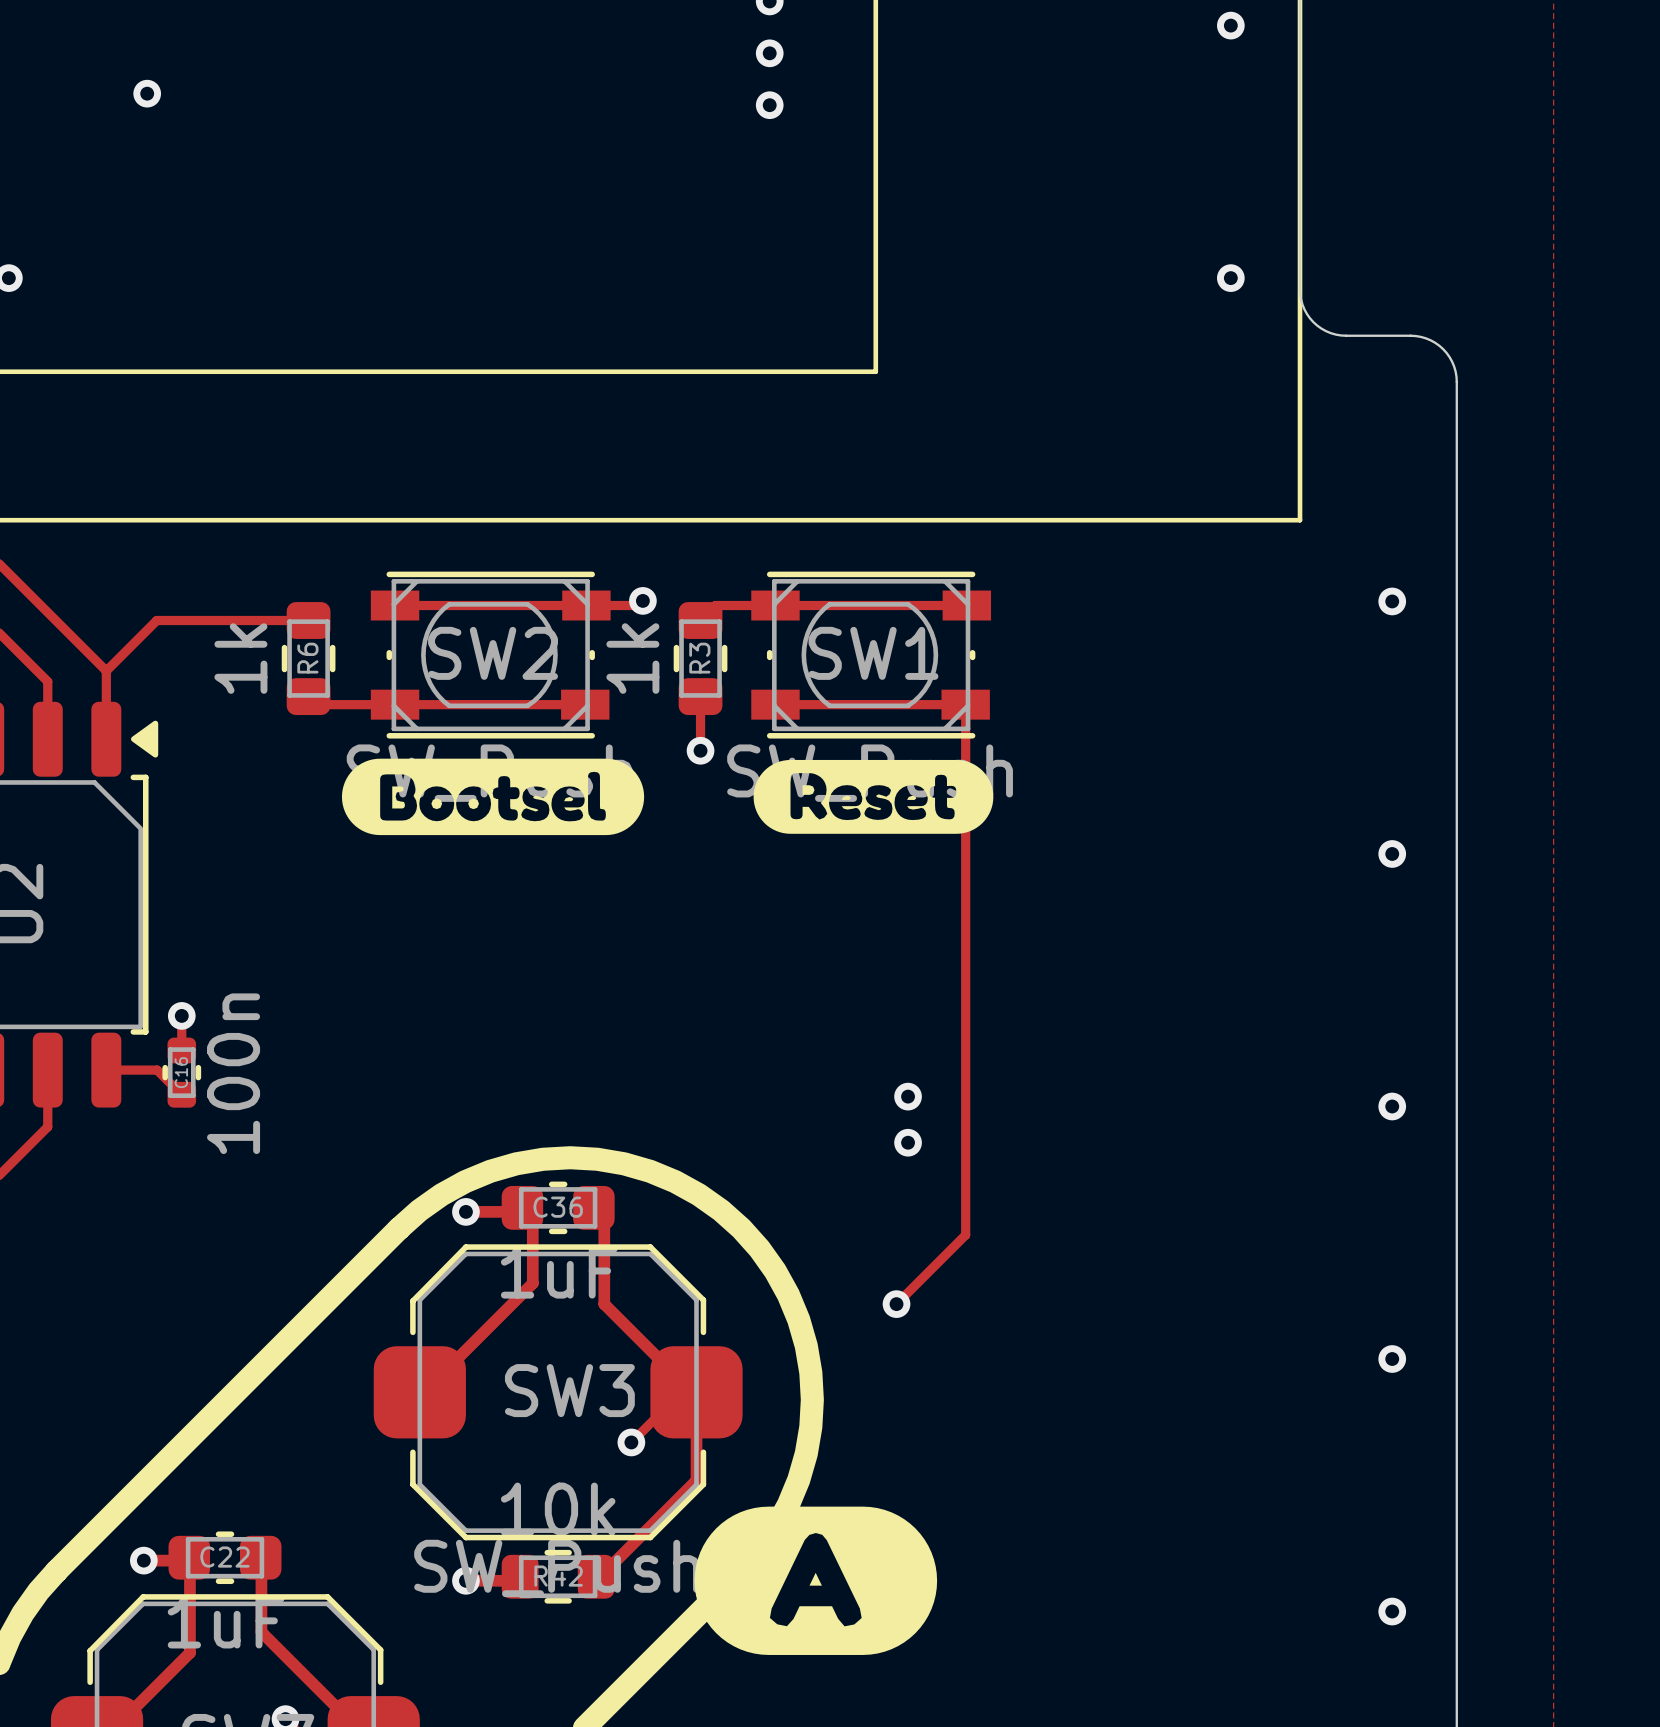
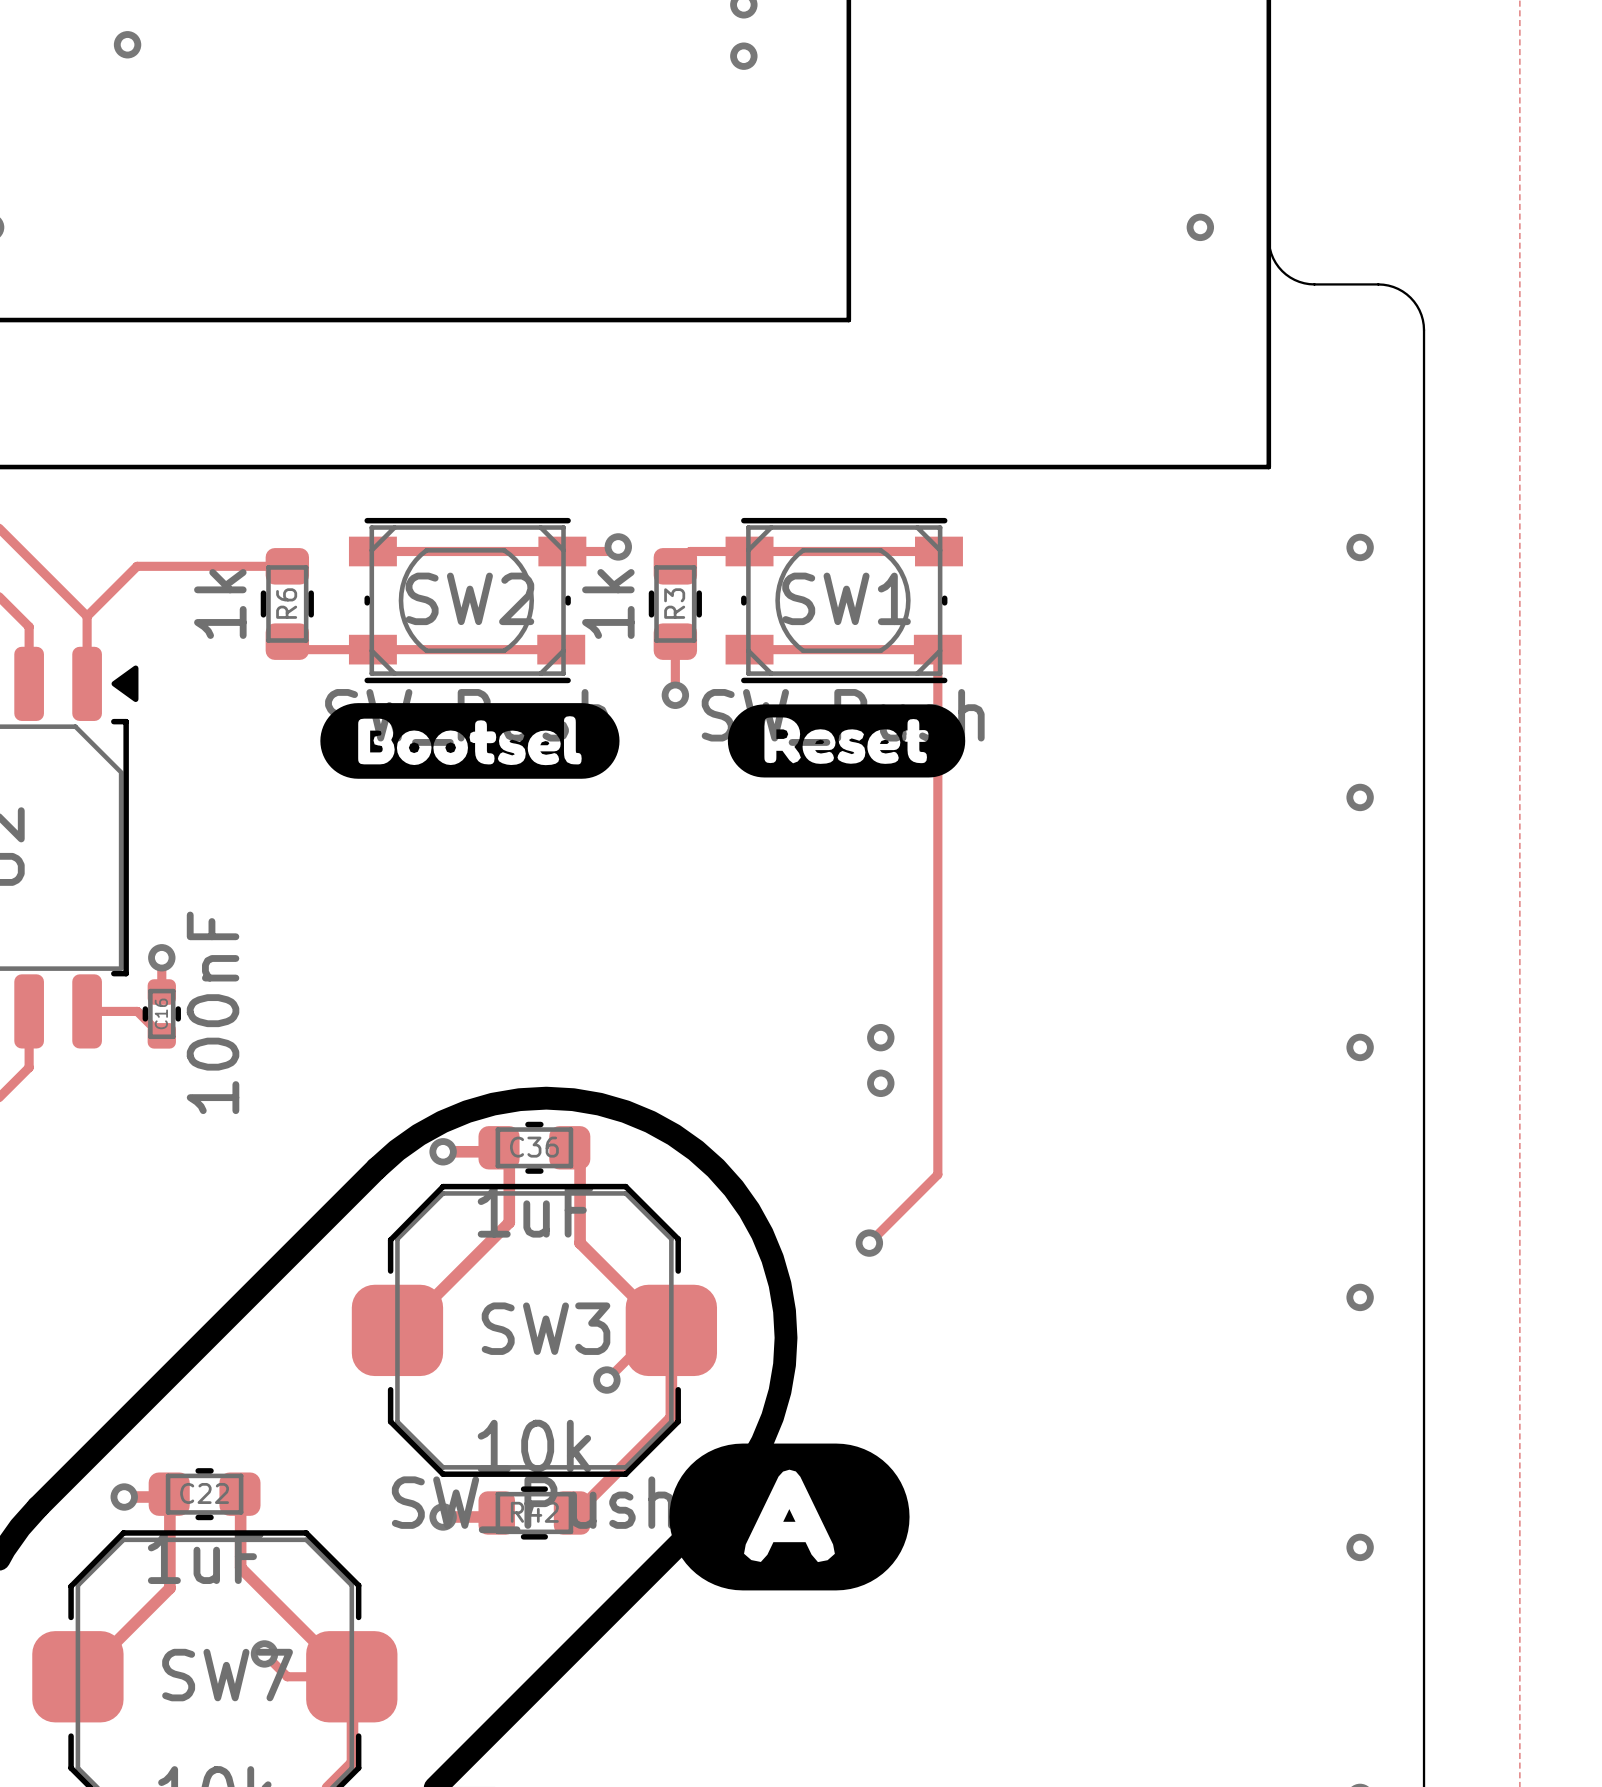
C16 value: 100n (233, 1073) -> 100nF (213, 1012)

